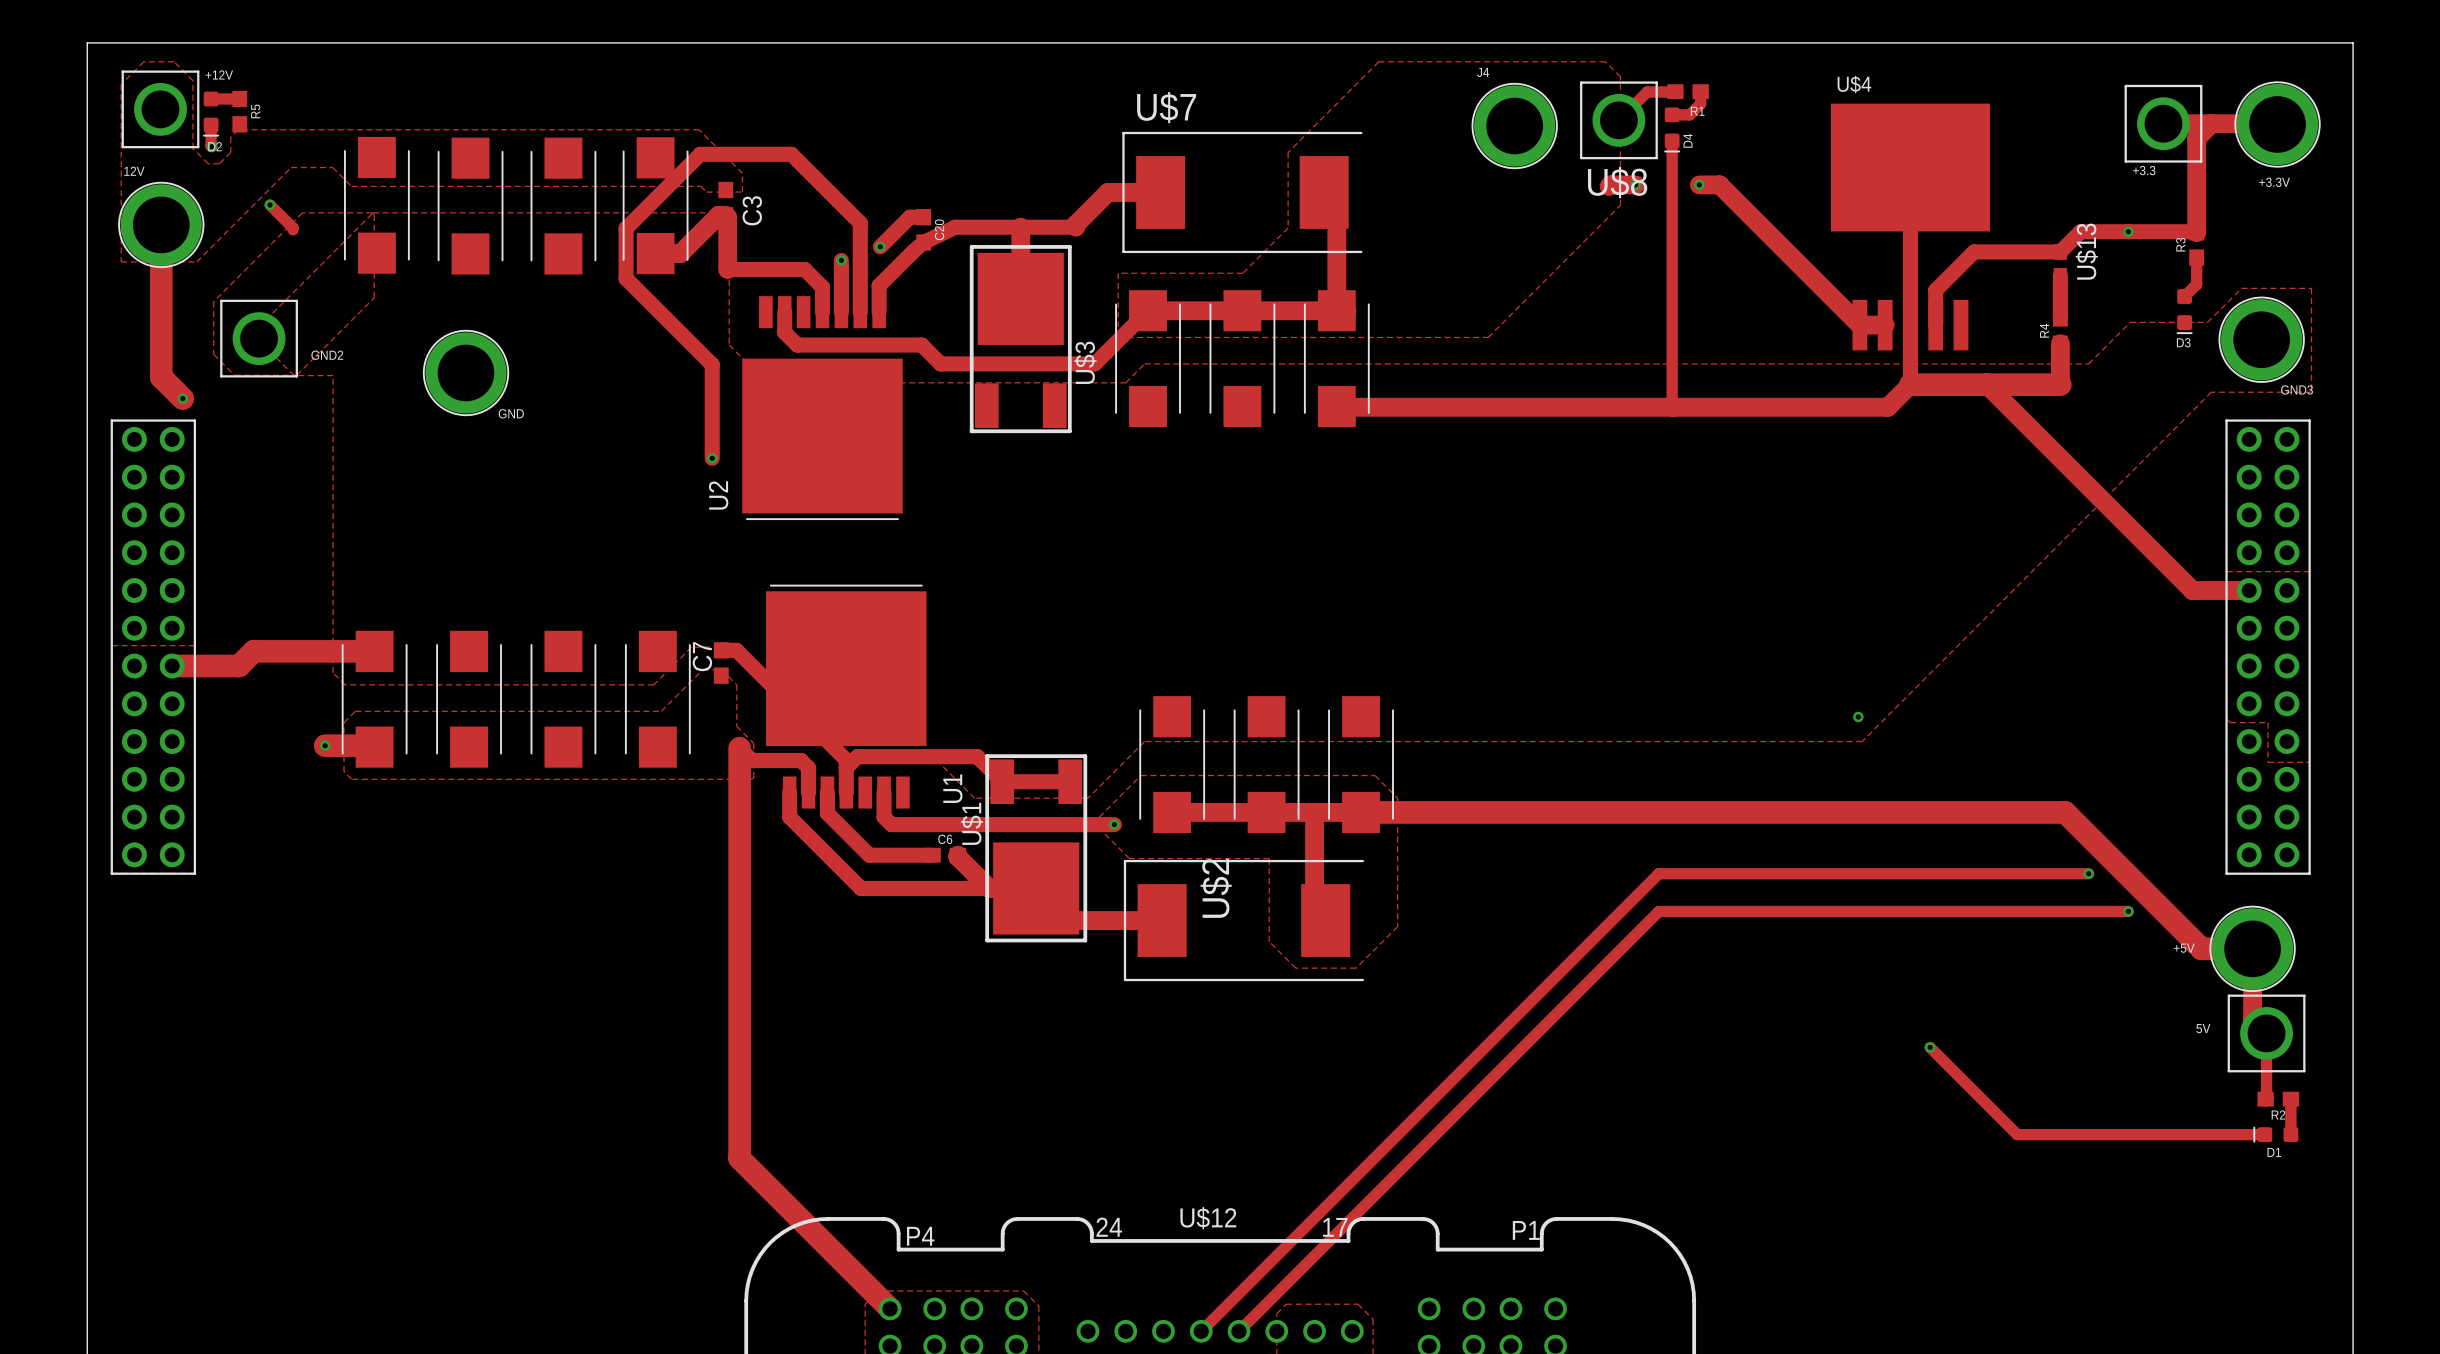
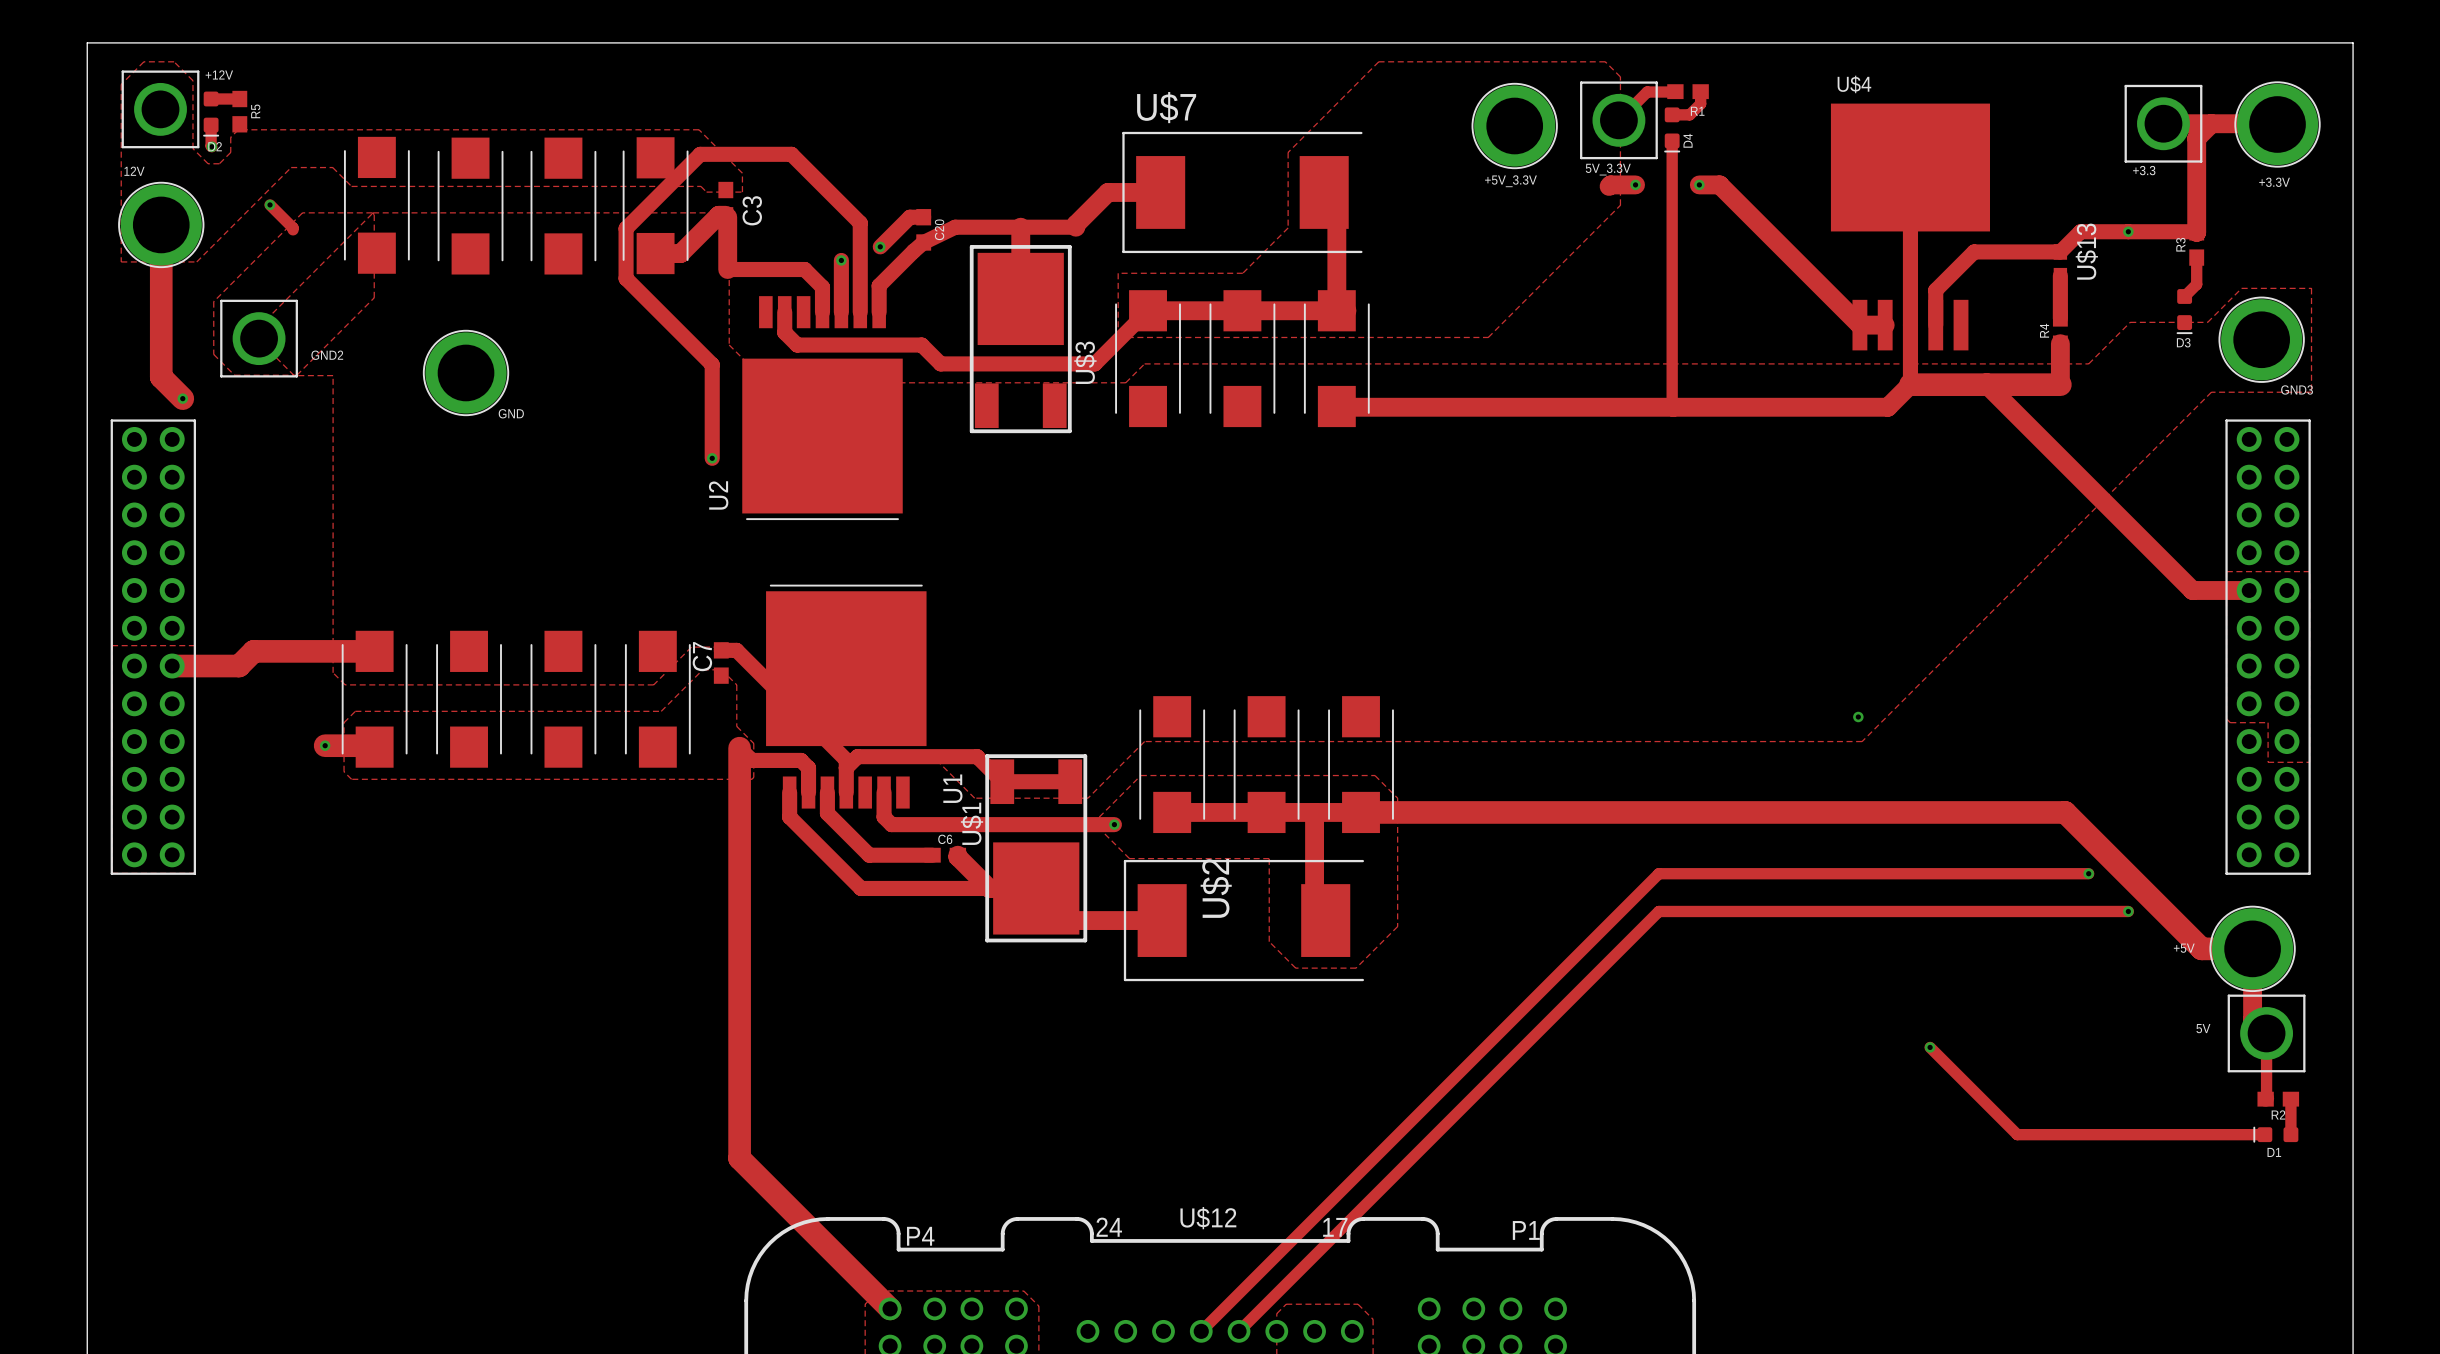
J4 name: J4 (1483, 72) -> +5V_3.3V (1510, 181)
U$8 name: U$8 (1617, 182) -> 5V_3.3V (1608, 169)

